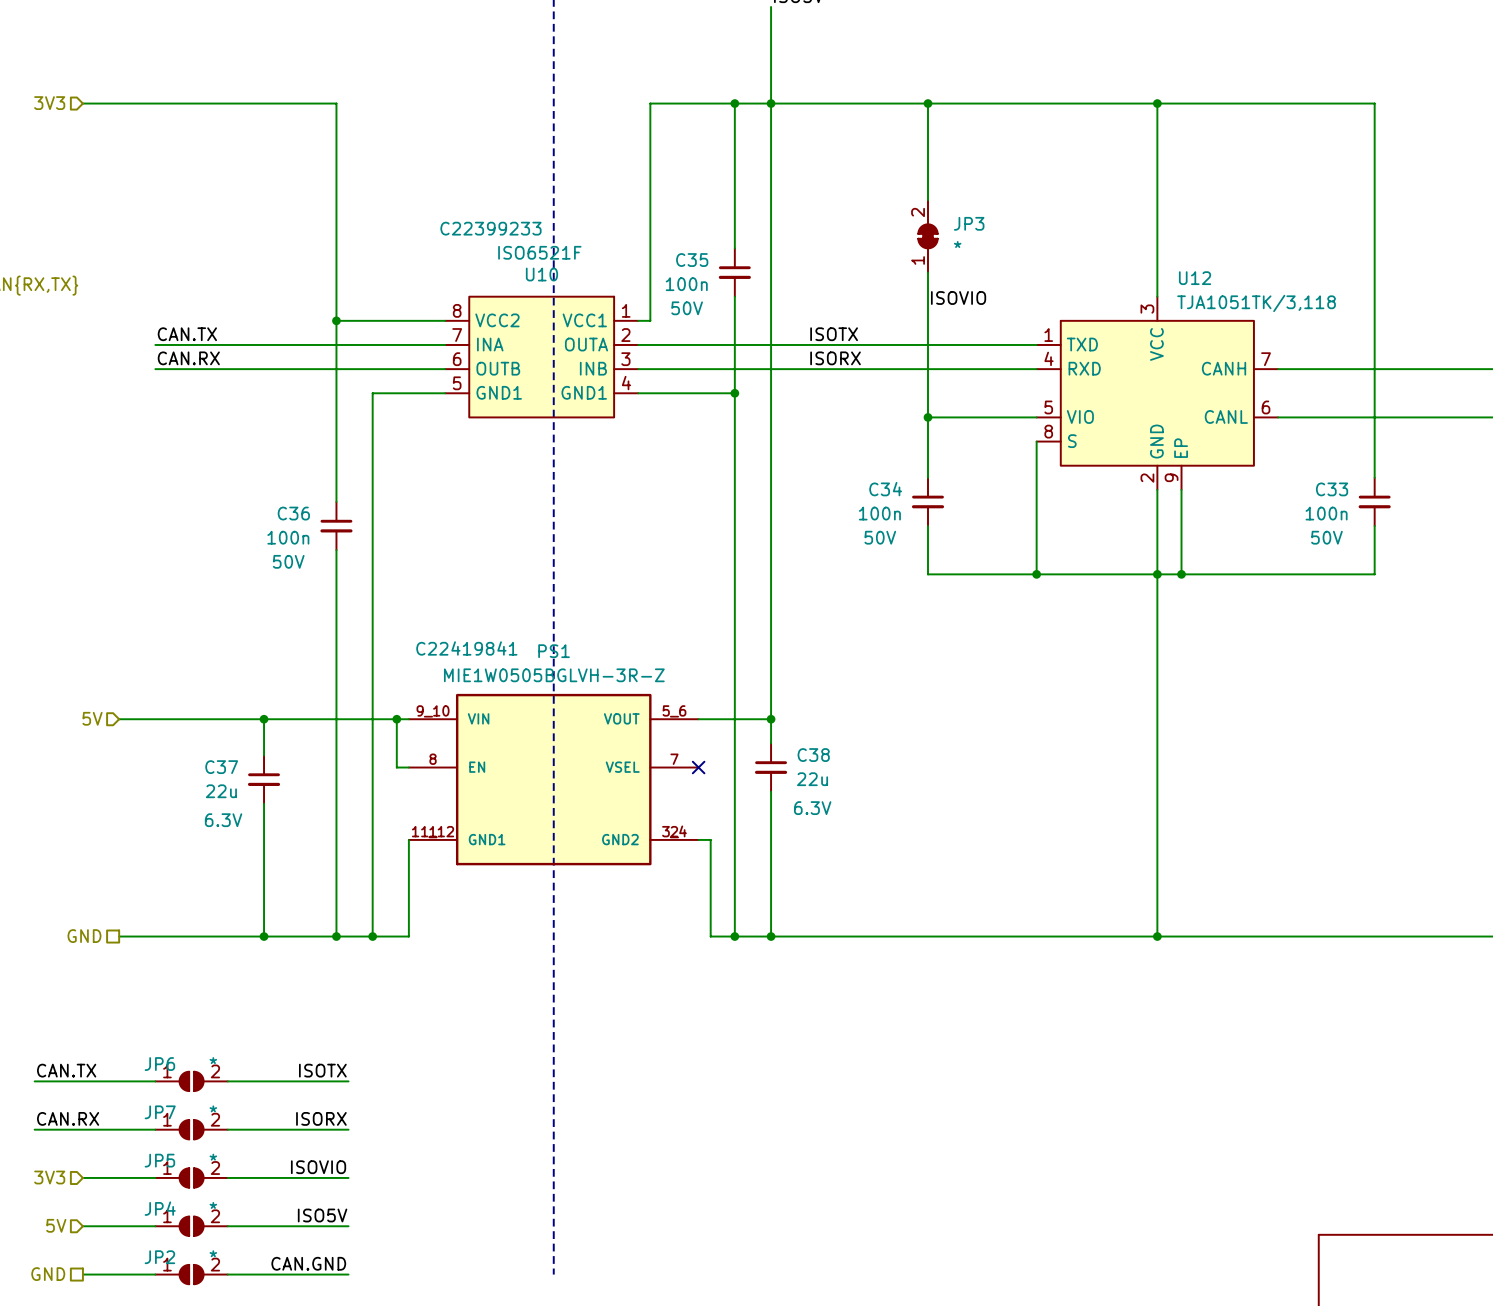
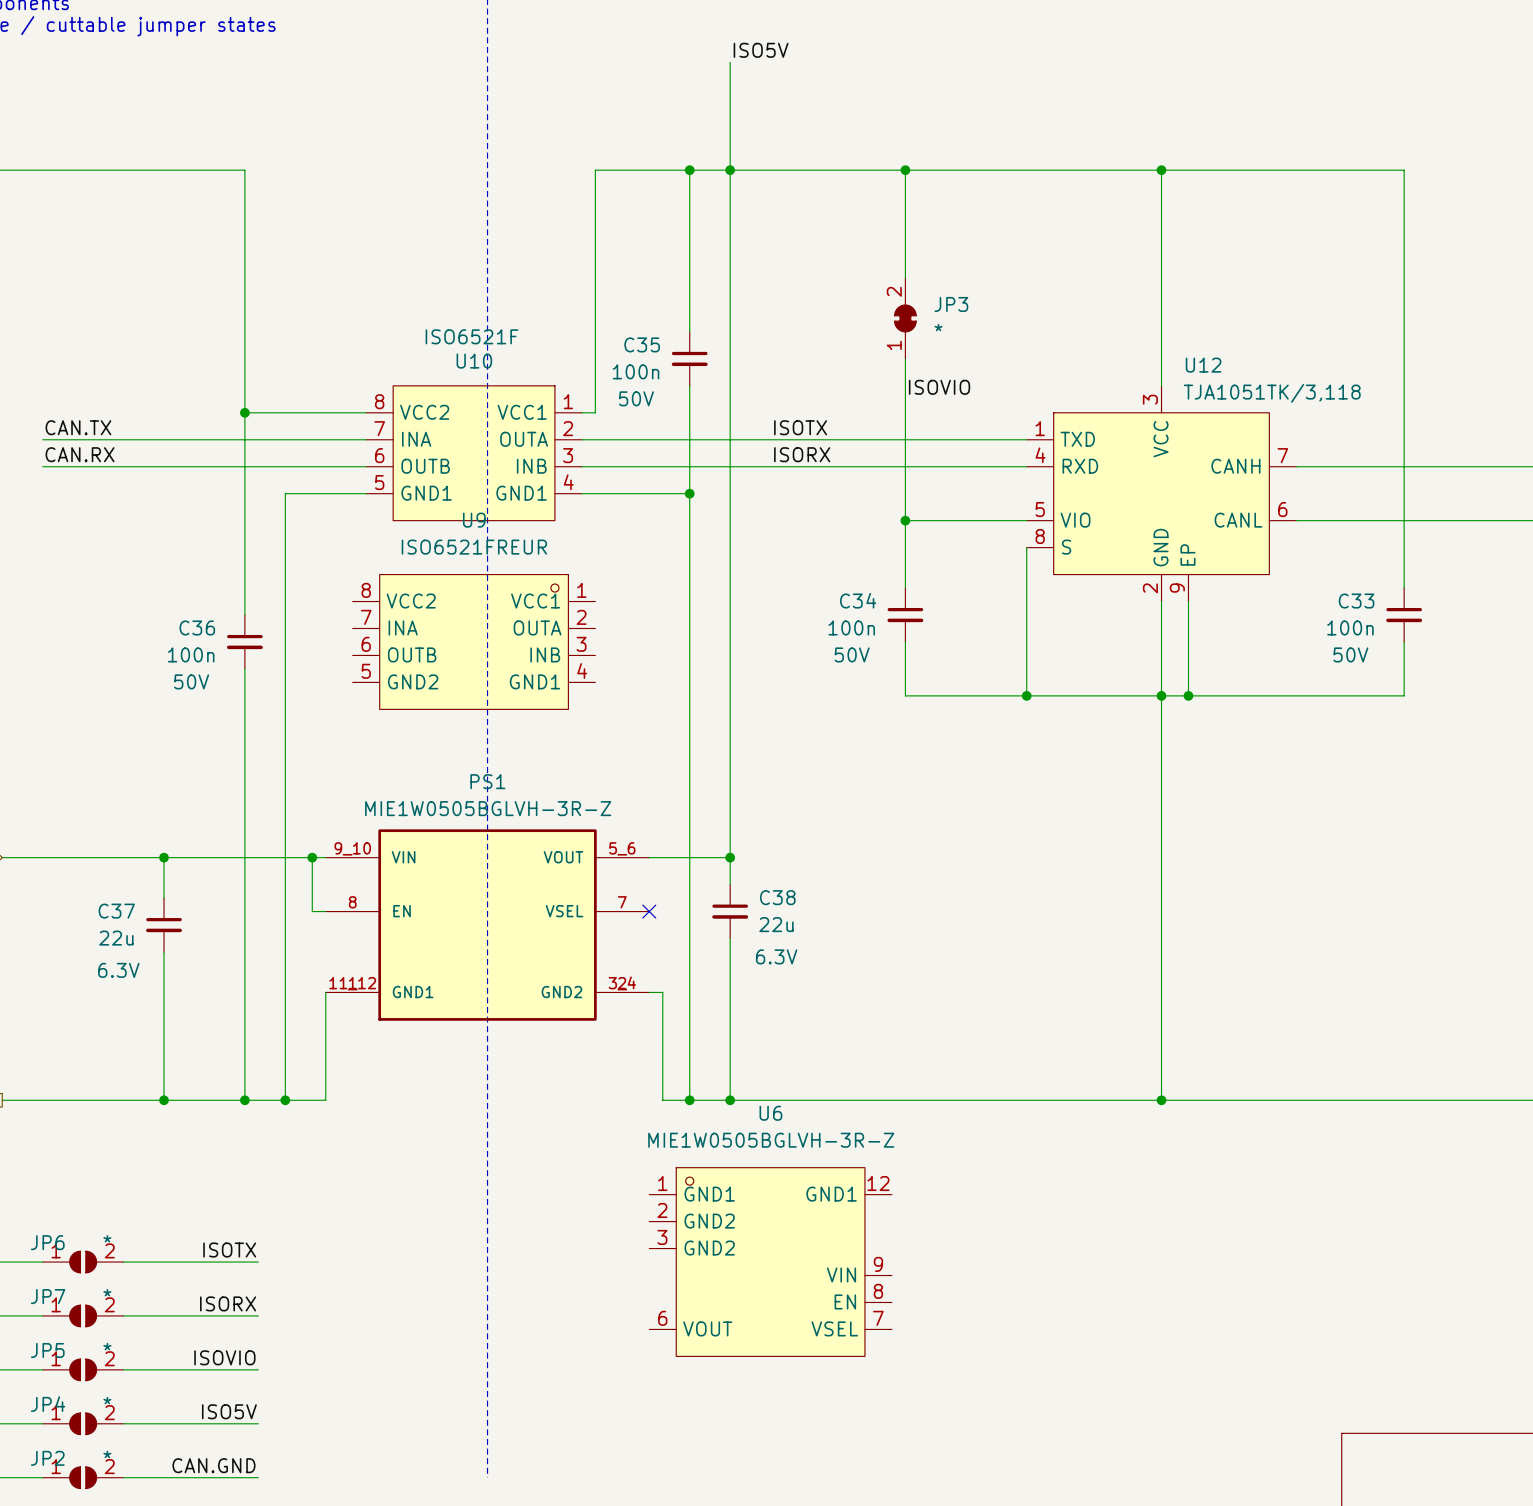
U10 text: C22399233 (490, 228) -> none
U9: none -> ISO6521FREUR (474, 641)
PS1 text: C22419841 (466, 648) -> none
U6: none -> MIE1W0505BGLVH-3R-Z (770, 1262)

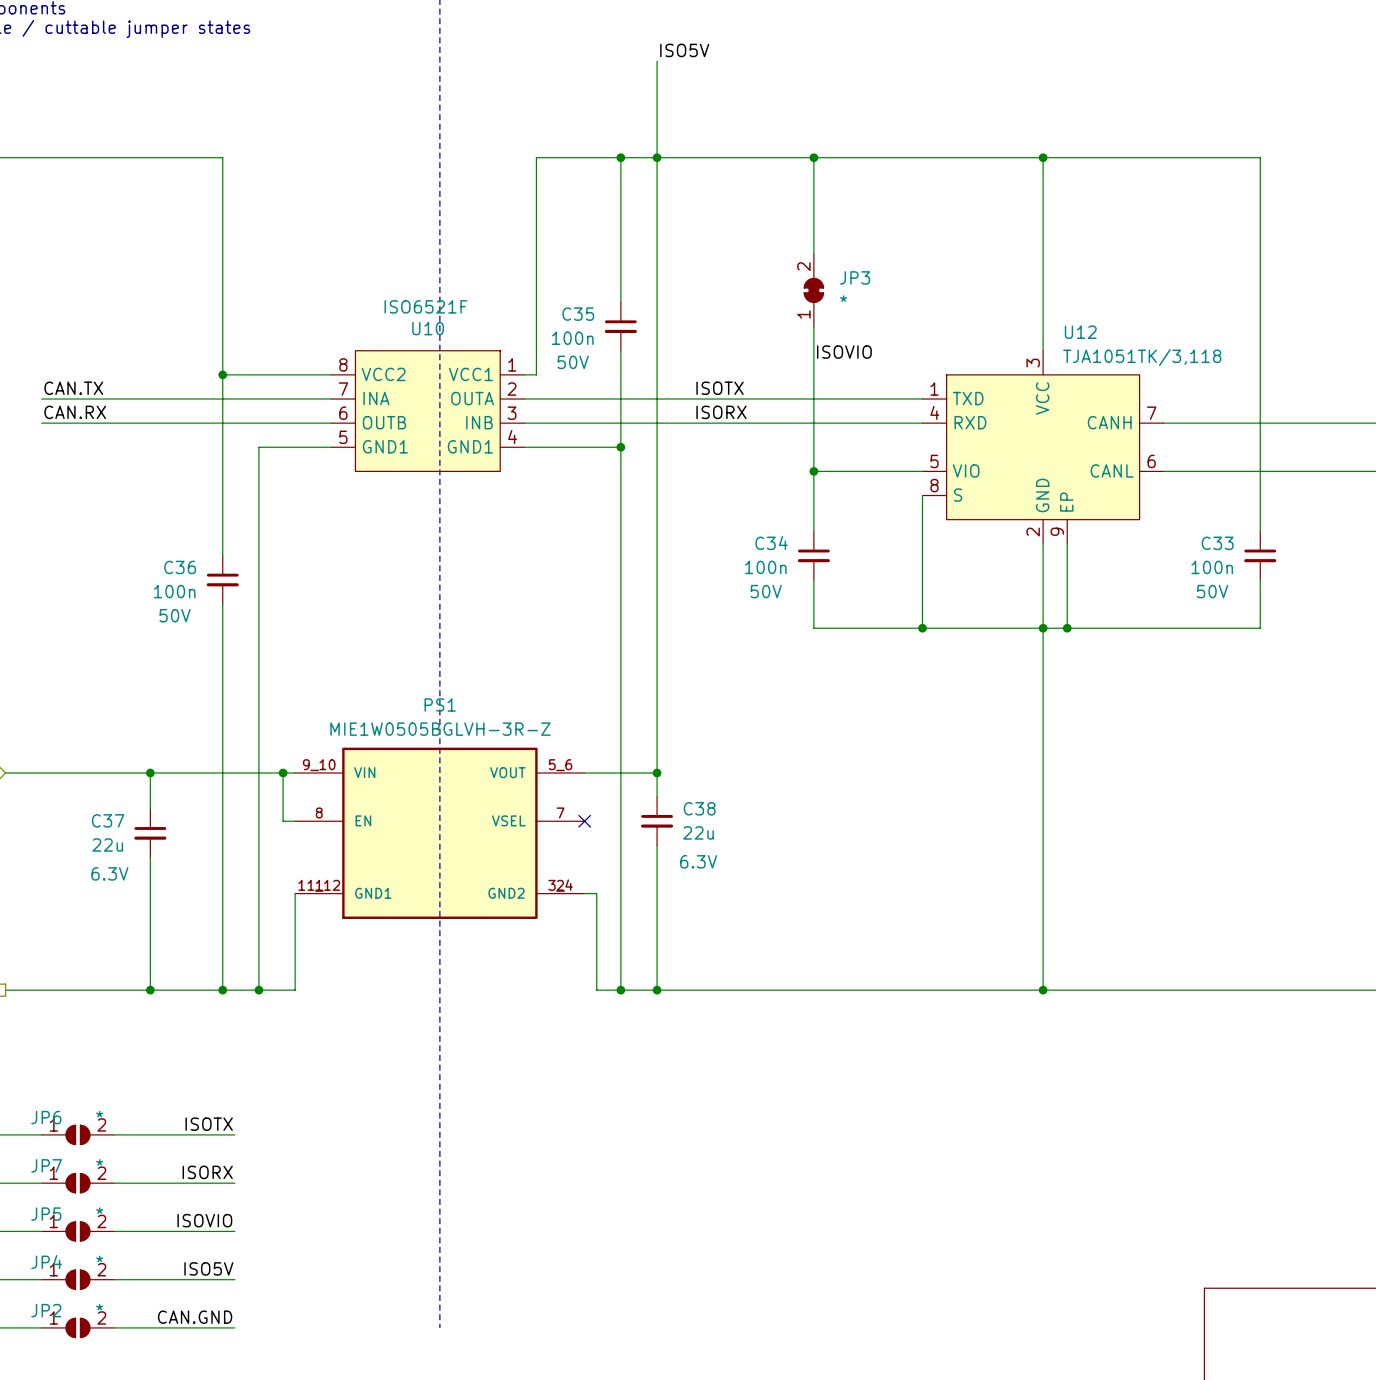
U9: ISO6521FREUR (474, 641) -> none
U6: MIE1W0505BGLVH-3R-Z (770, 1262) -> none

